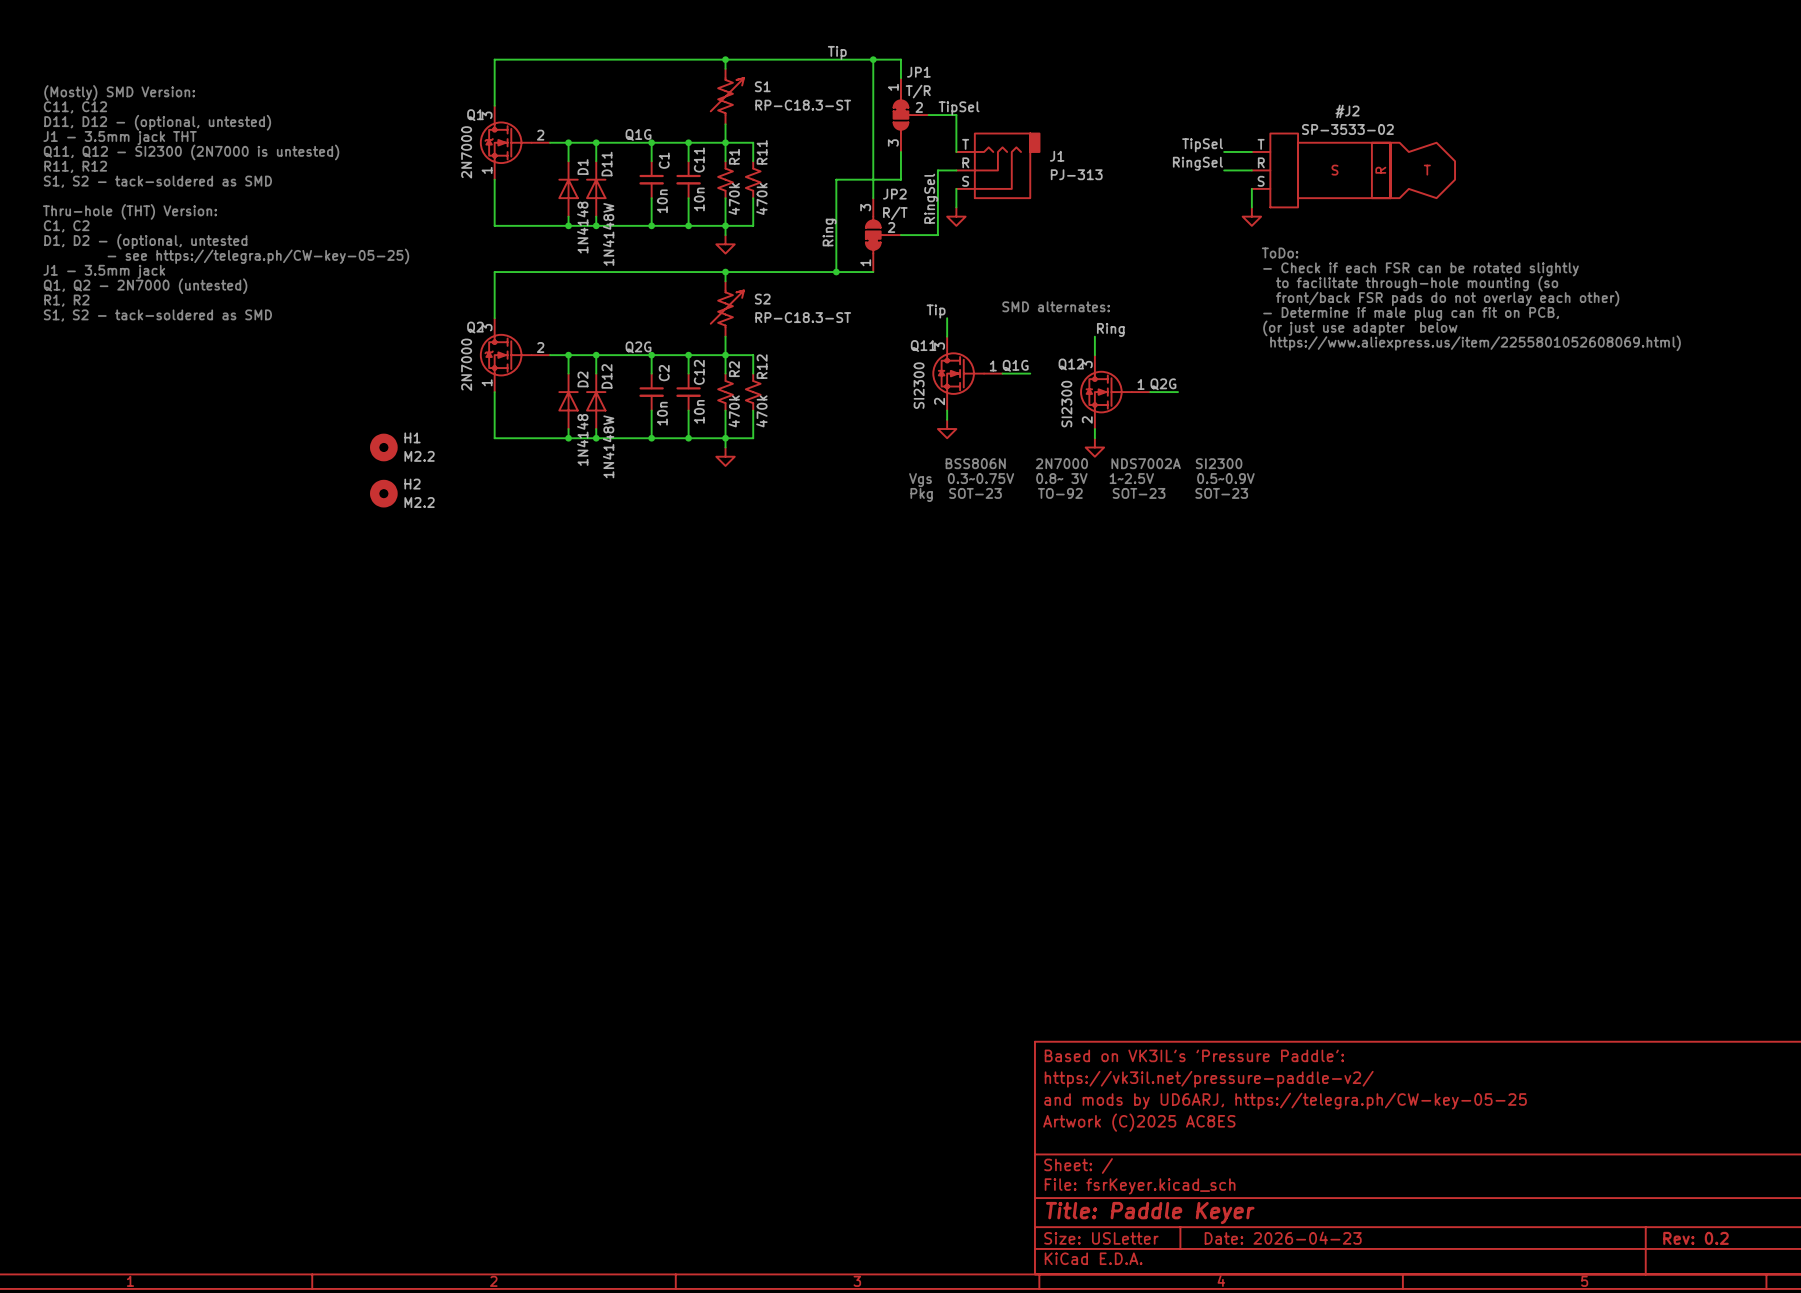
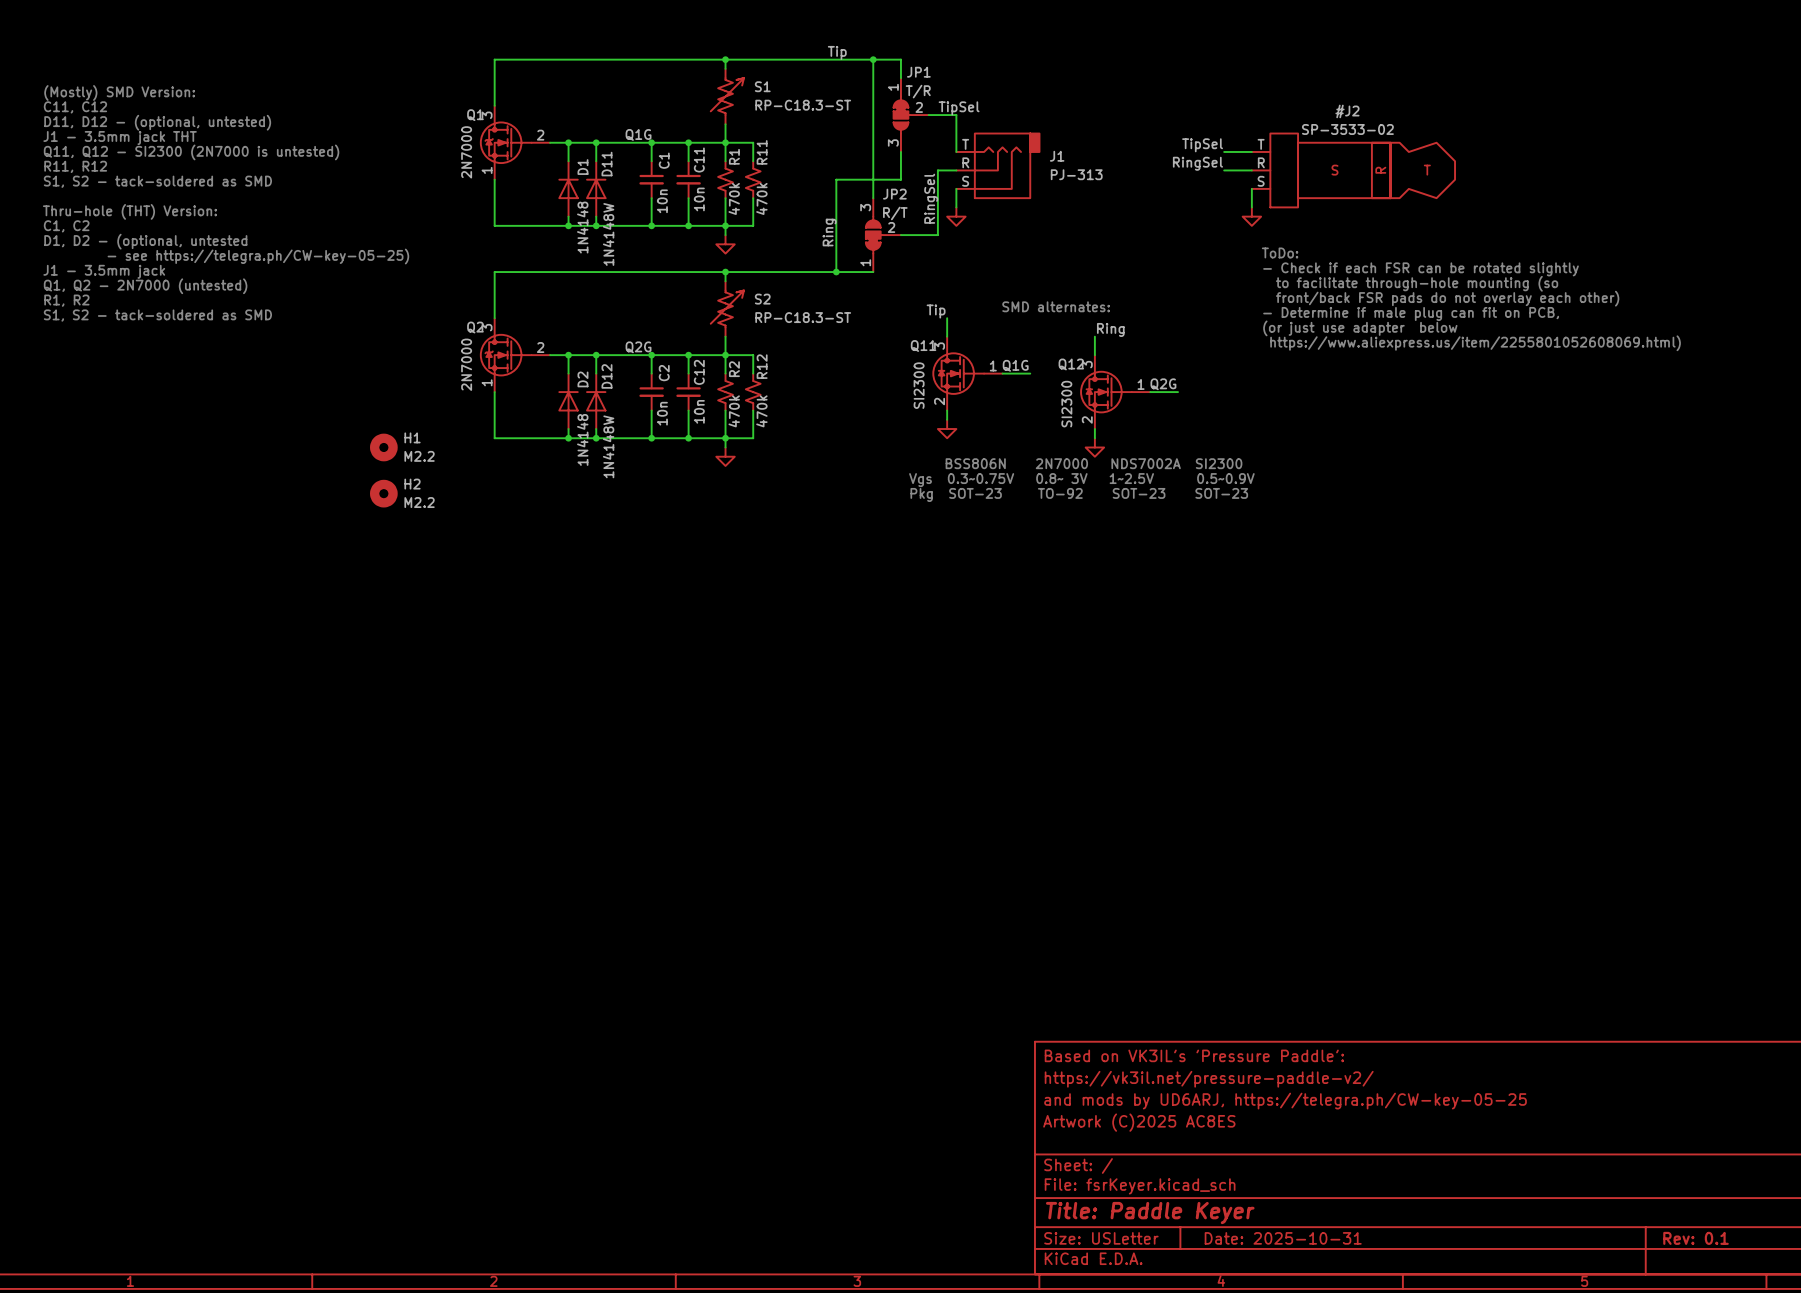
title block: Date: 2026-04-23 (1283, 1238) -> Date: 2025-10-31 (1283, 1238)
title block: Rev: 0.2 (1696, 1238) -> Rev: 0.1 (1696, 1238)

